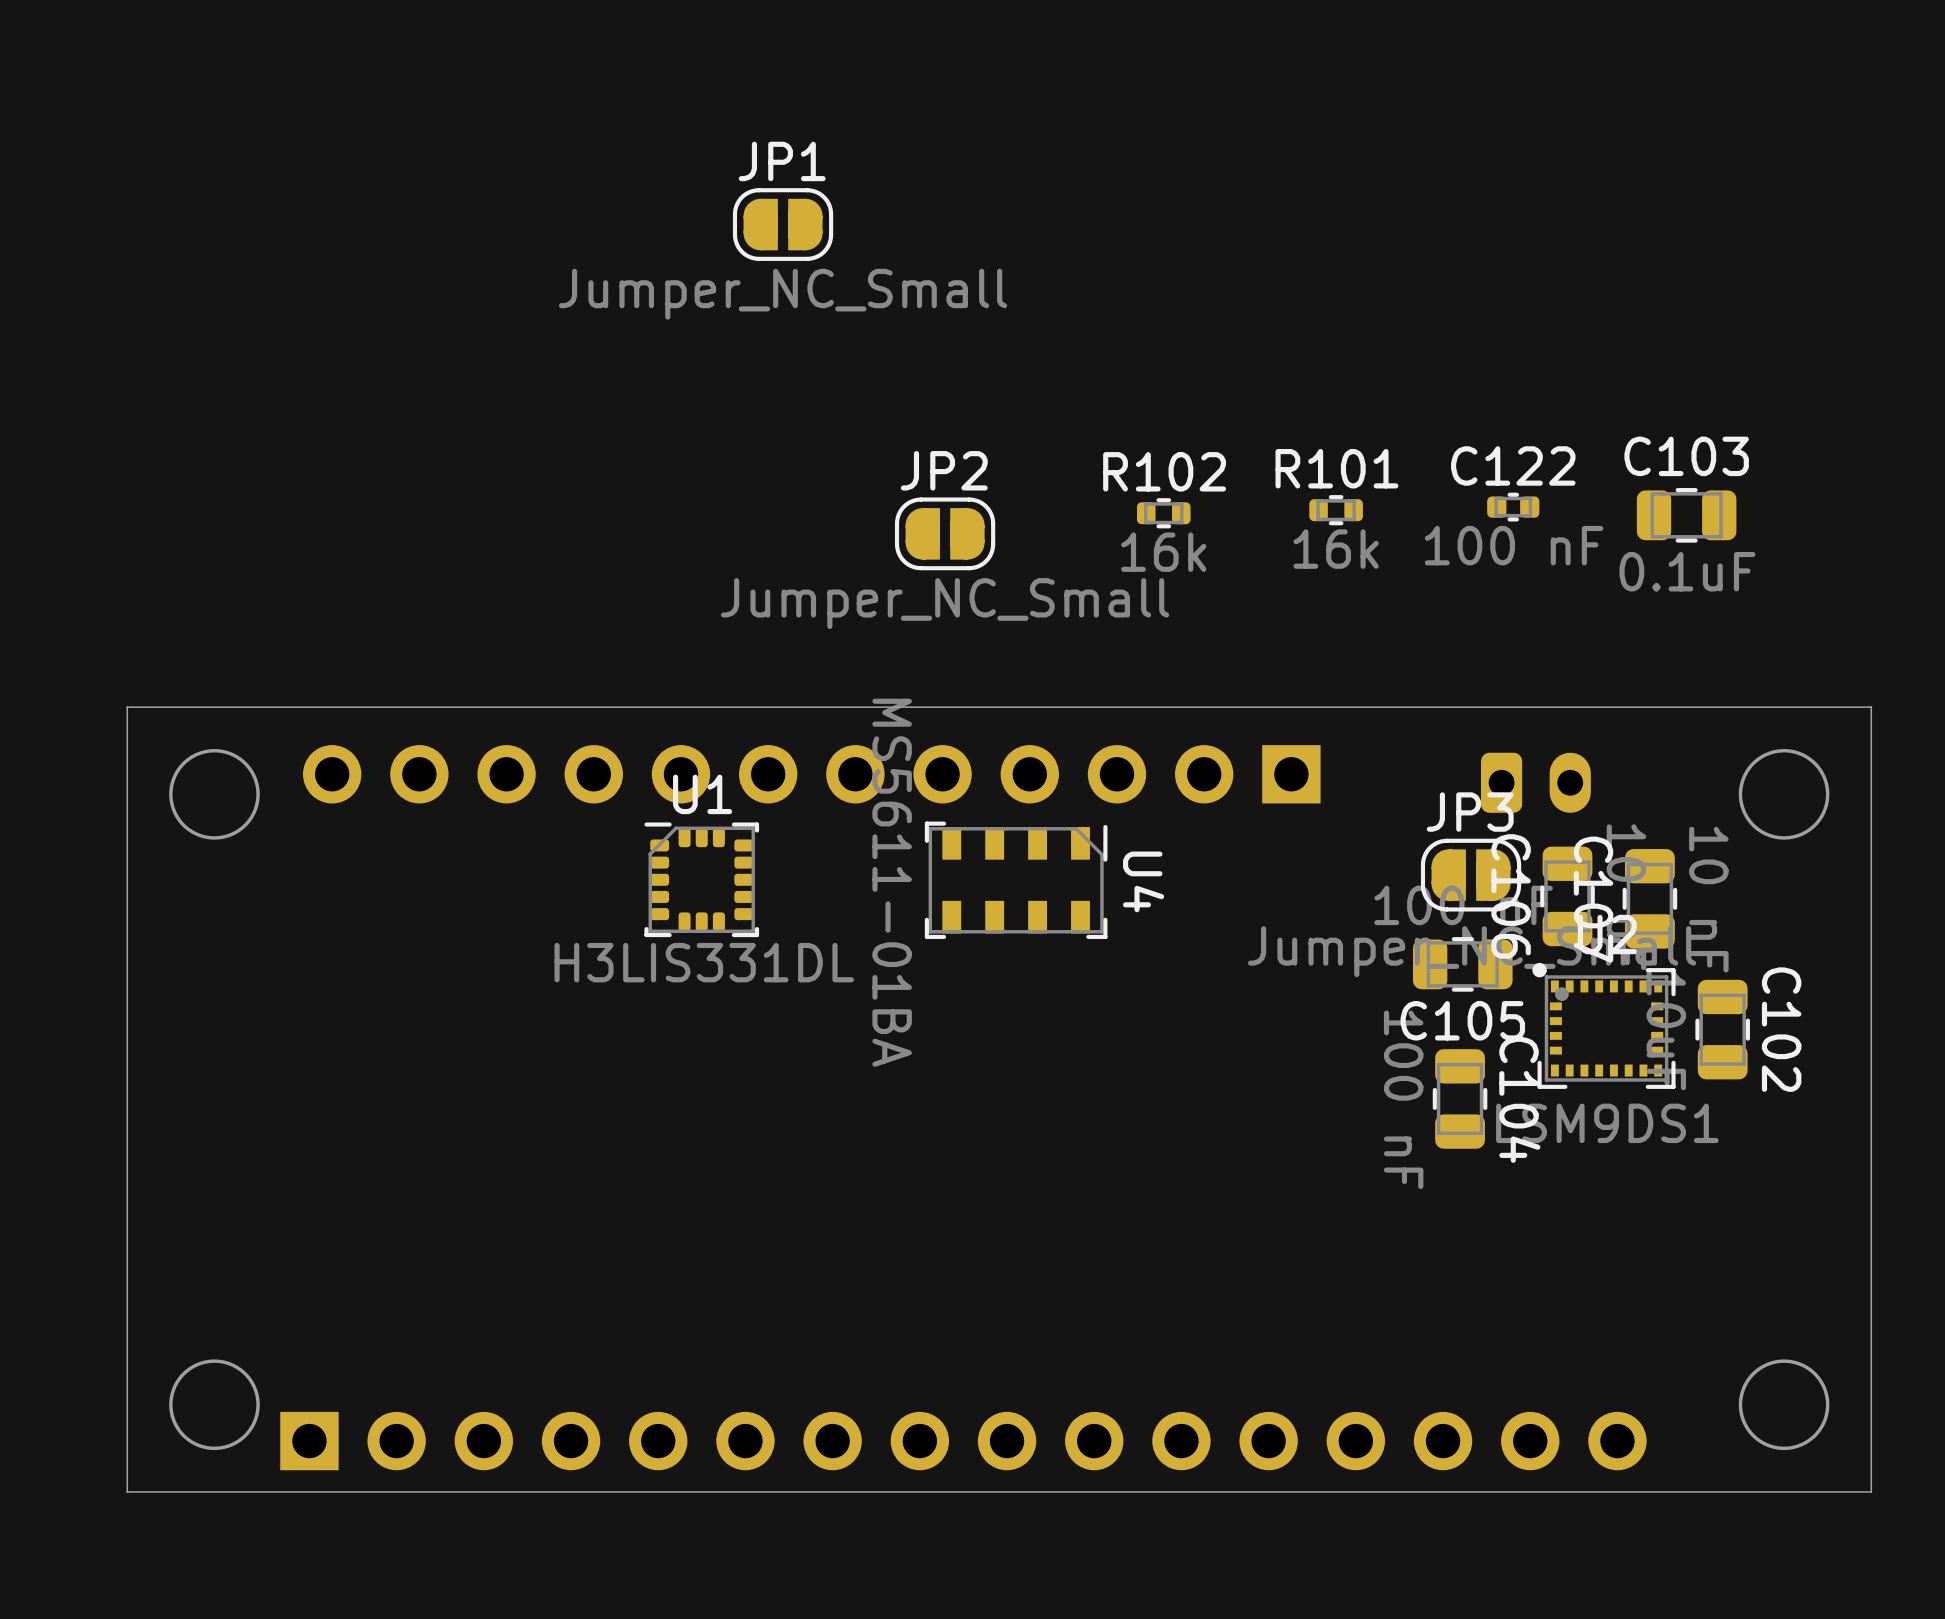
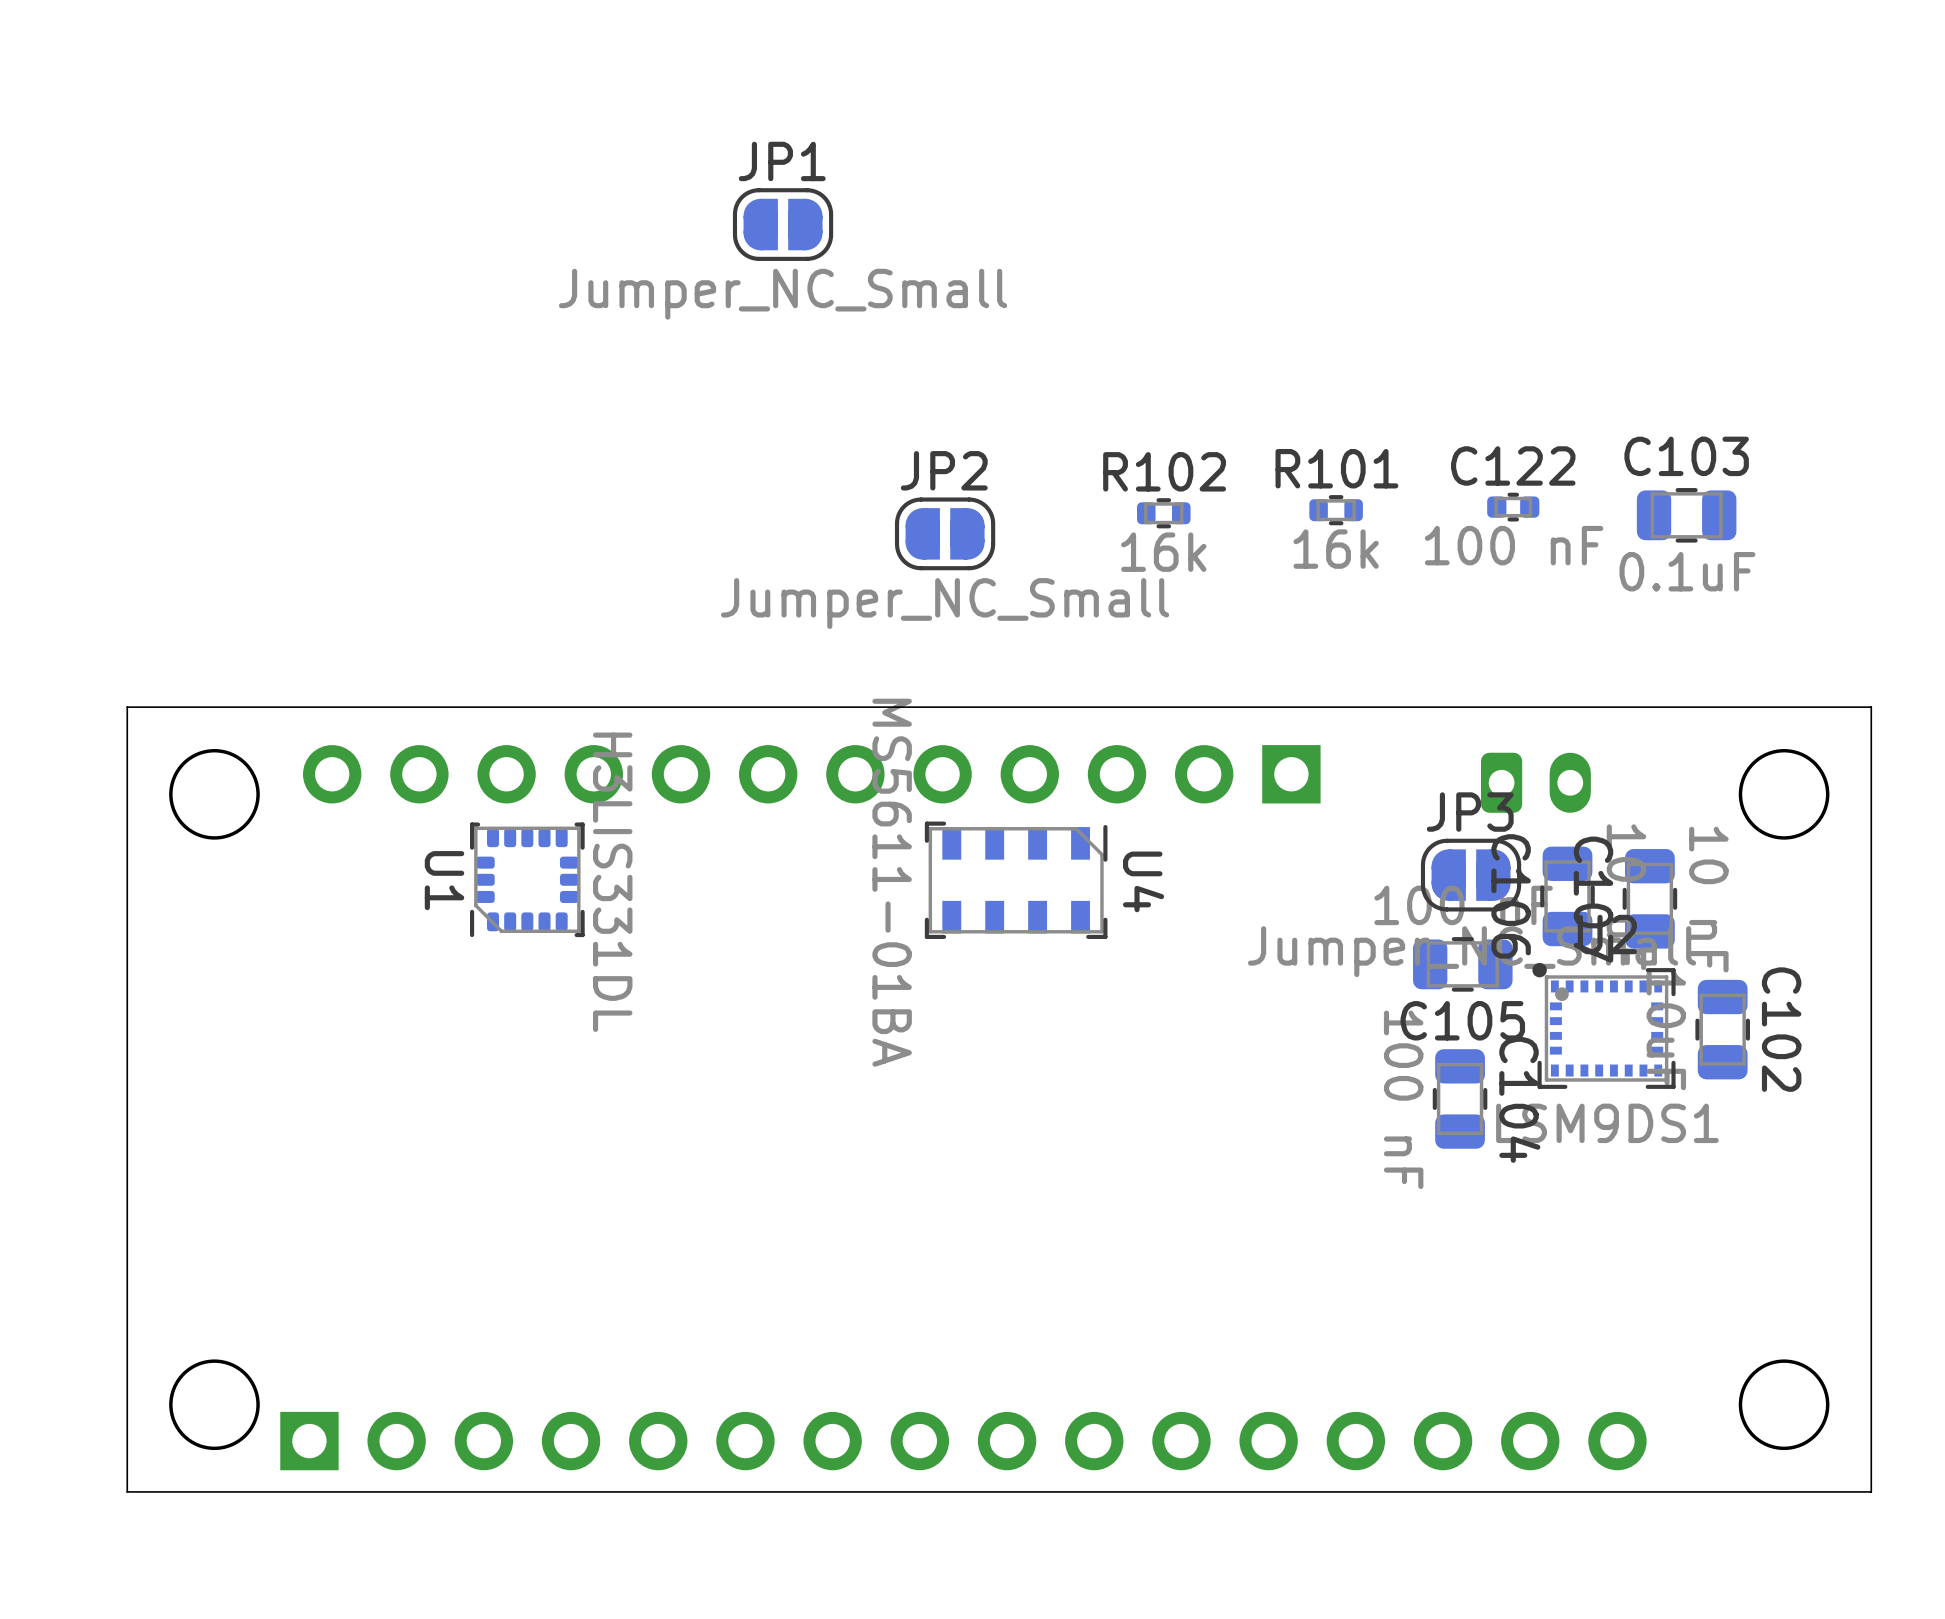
U1 rotation: 0° (701, 879) -> 90° counterclockwise (527, 879)
U1 position: (701, 879) -> (527, 879)

